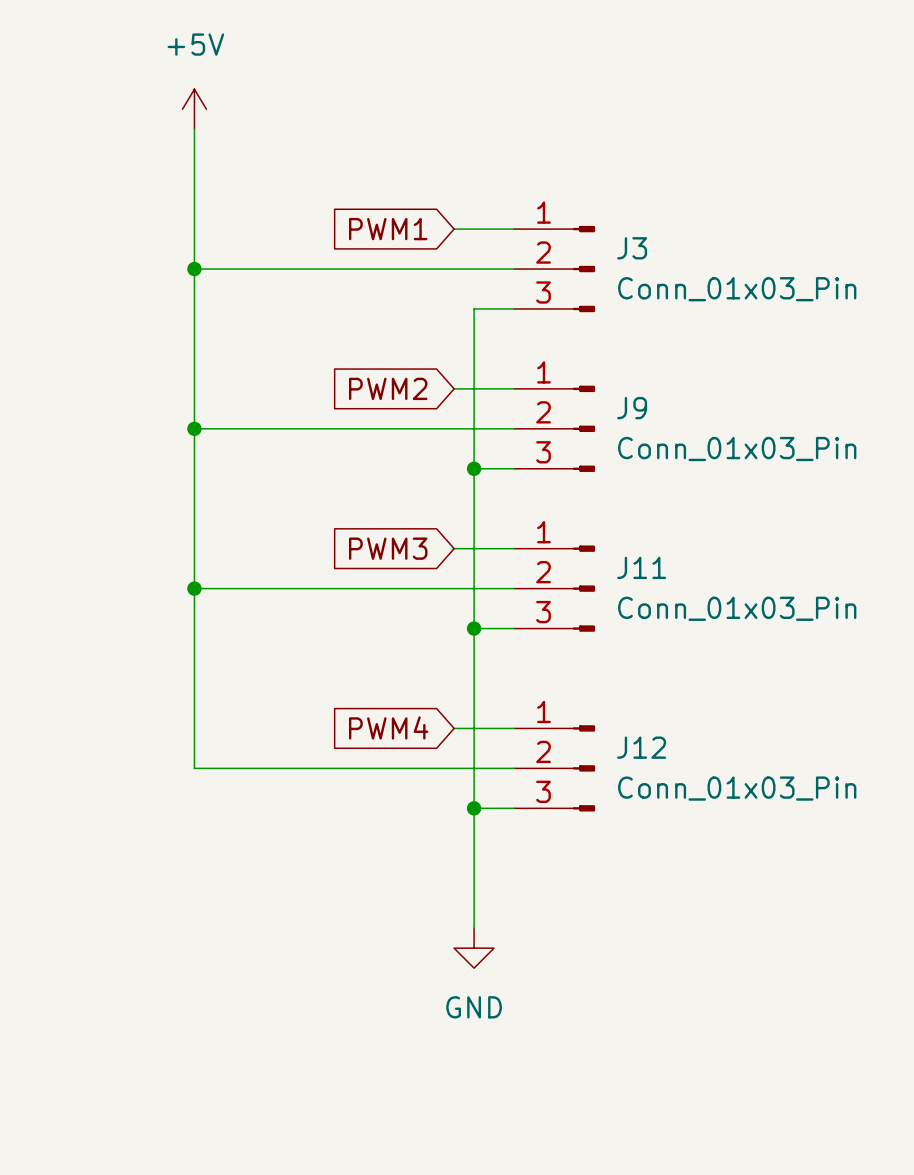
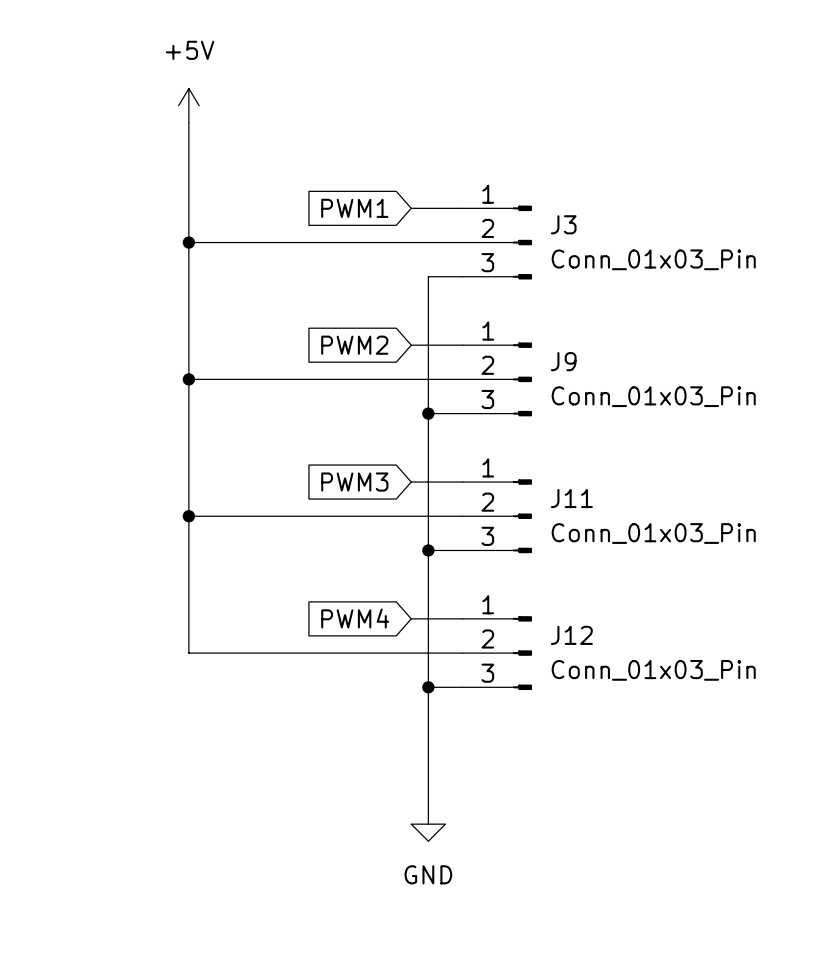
global label position: PWM4 (388, 727) -> PWM4 (355, 618)
wire: (454, 728) (514, 728) -> (411, 618) (462, 618)
wire: (194, 748) (194, 768) (514, 768) -> (188, 653) (462, 653)
J12 position: (554, 768) -> (497, 653)
wire: (474, 808) (514, 808) -> (428, 687) (462, 687)
junction position: (474, 808) -> (428, 687)

